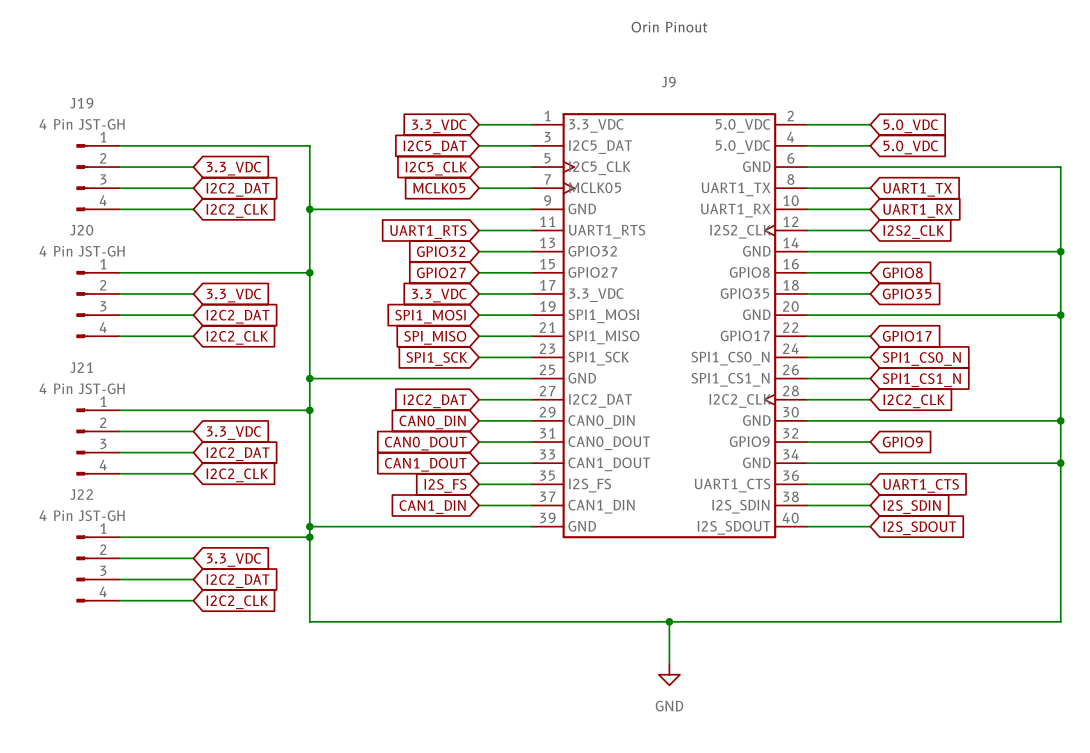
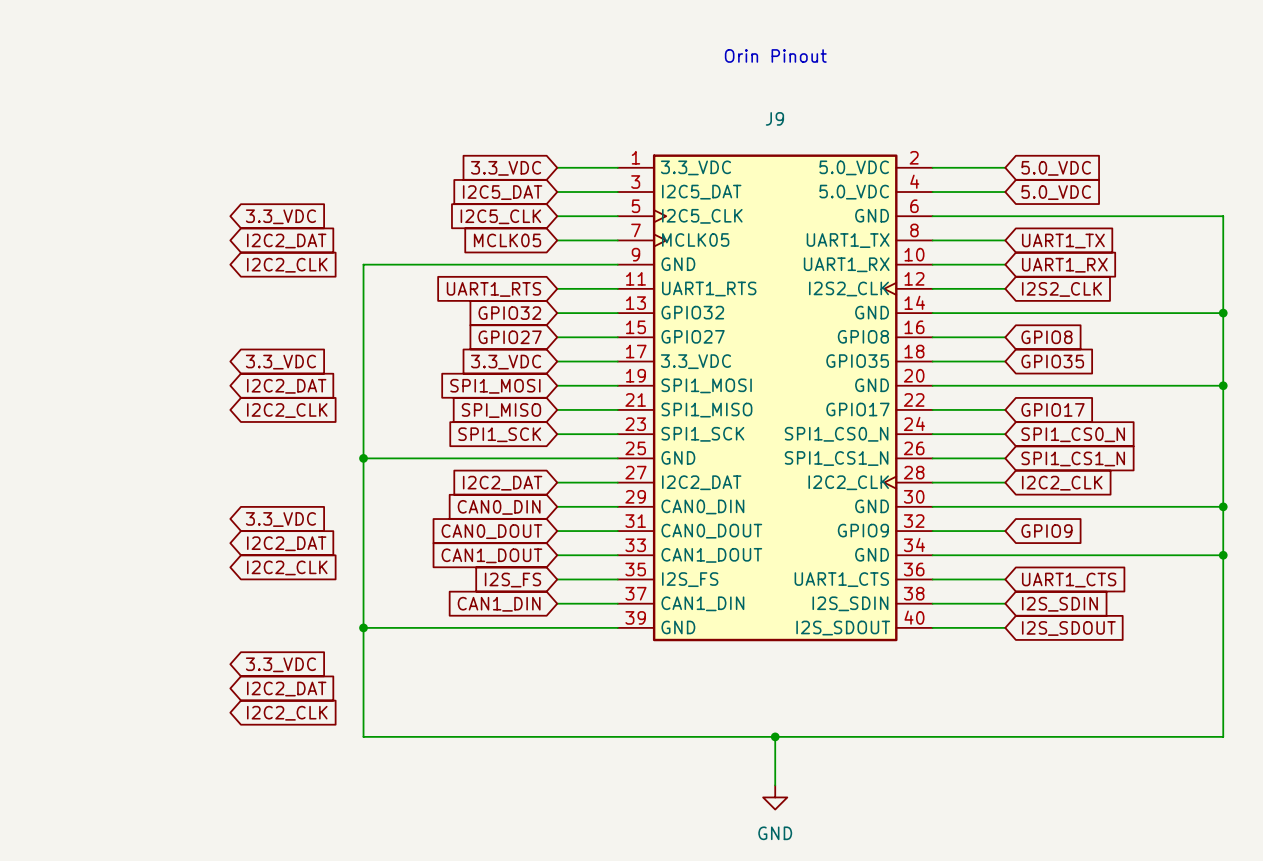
wire: (119, 145) (309, 145) (309, 209) -> none
wire: (119, 167) (193, 167) -> none
J19: 4 Pin JST-GH (97, 177) -> none
wire: (119, 188) (193, 188) -> none
wire: (119, 209) (193, 209) -> none
junction: (309, 209) -> none
wire: (119, 272) (309, 272) -> none
junction: (309, 272) -> none
wire: (119, 293) (193, 293) -> none
J20: 4 Pin JST-GH (97, 304) -> none
wire: (119, 315) (193, 315) -> none
wire: (119, 336) (193, 336) -> none
wire: (119, 410) (309, 410) -> none
junction: (309, 410) -> none
wire: (119, 431) (193, 431) -> none
J21: 4 Pin JST-GH (97, 442) -> none
wire: (119, 452) (193, 452) -> none
wire: (119, 473) (193, 473) -> none
wire: (119, 537) (309, 537) -> none
junction: (309, 537) -> none
wire: (119, 558) (193, 558) -> none
J22: 4 Pin JST-GH (97, 568) -> none
wire: (119, 579) (193, 579) -> none
wire: (119, 600) (193, 600) -> none

